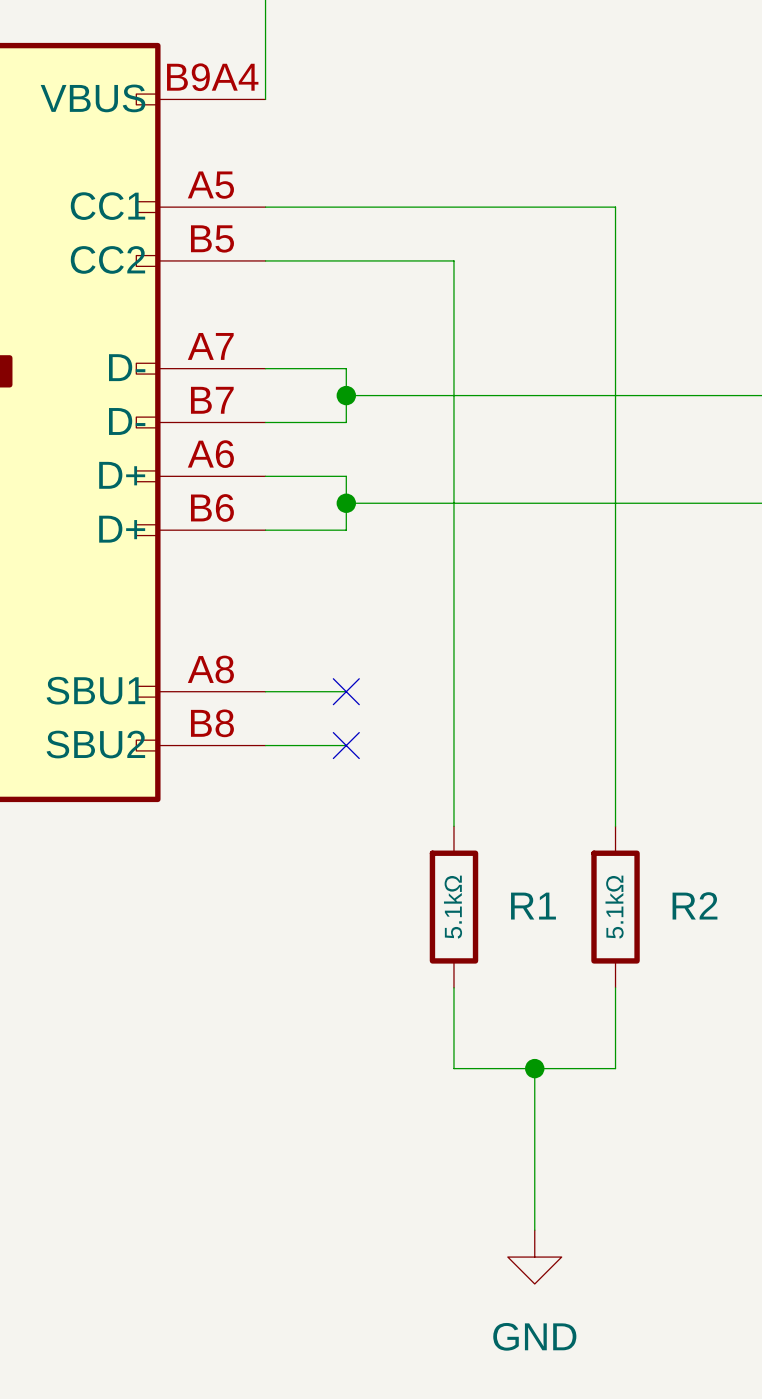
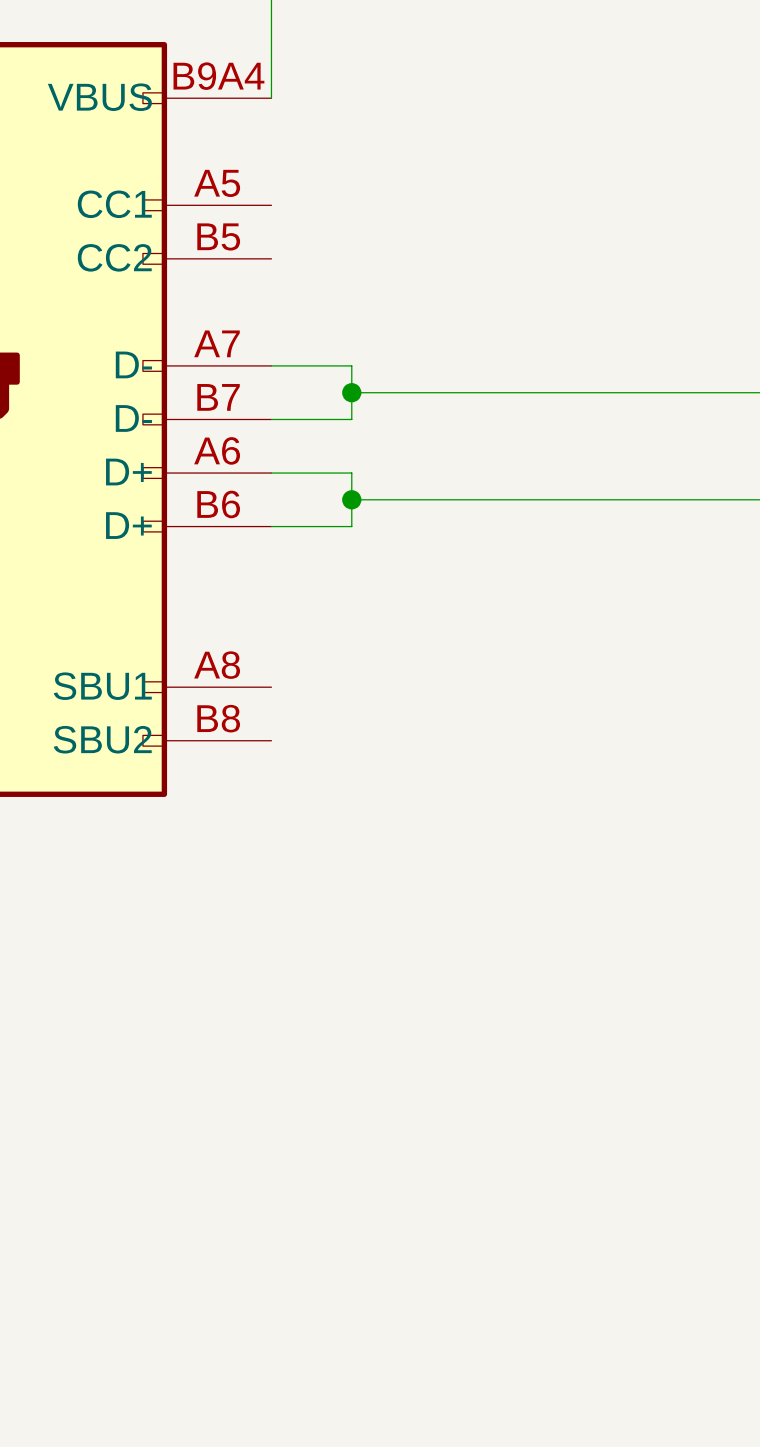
wire: (265, 207) (615, 207) (615, 826) -> none
wire: (265, 260) (453, 260) (453, 826) -> none
wire: (265, 691) (346, 691) -> none
no-connect mark: (346, 691) -> none
wire: (265, 745) (346, 745) -> none
no-connect mark: (346, 745) -> none
R1: 5.1kΩ (453, 907) -> none
R2: 5.1kΩ (615, 907) -> none
wire: (453, 987) (453, 1068) (615, 1068) (615, 987) -> none
wire: (534, 1068) (534, 1230) -> none
junction: (534, 1068) -> none
power symbol: GND (534, 1257) -> none

